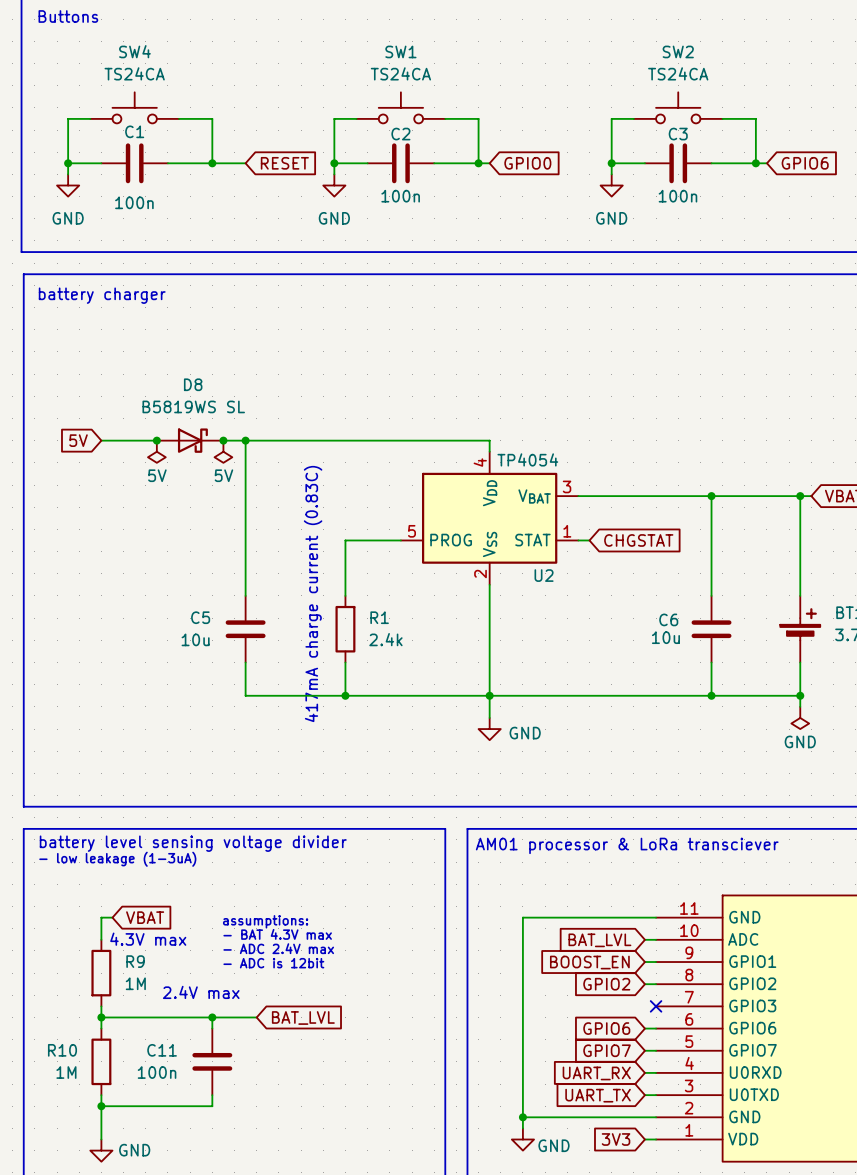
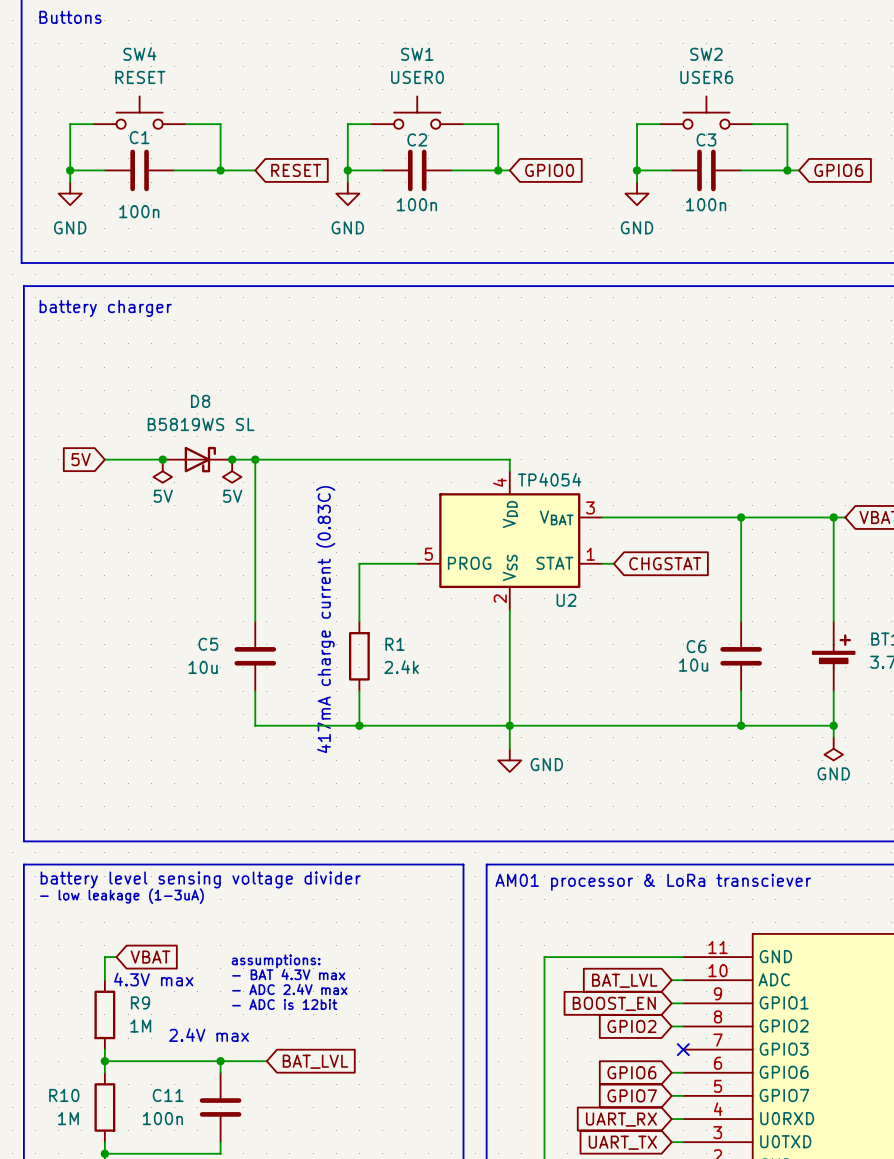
SW4 value: TS24CA (134, 73) -> RESET (140, 77)
SW1 value: TS24CA (400, 73) -> USER0 (417, 77)
SW2 value: TS24CA (678, 73) -> USER6 (706, 77)

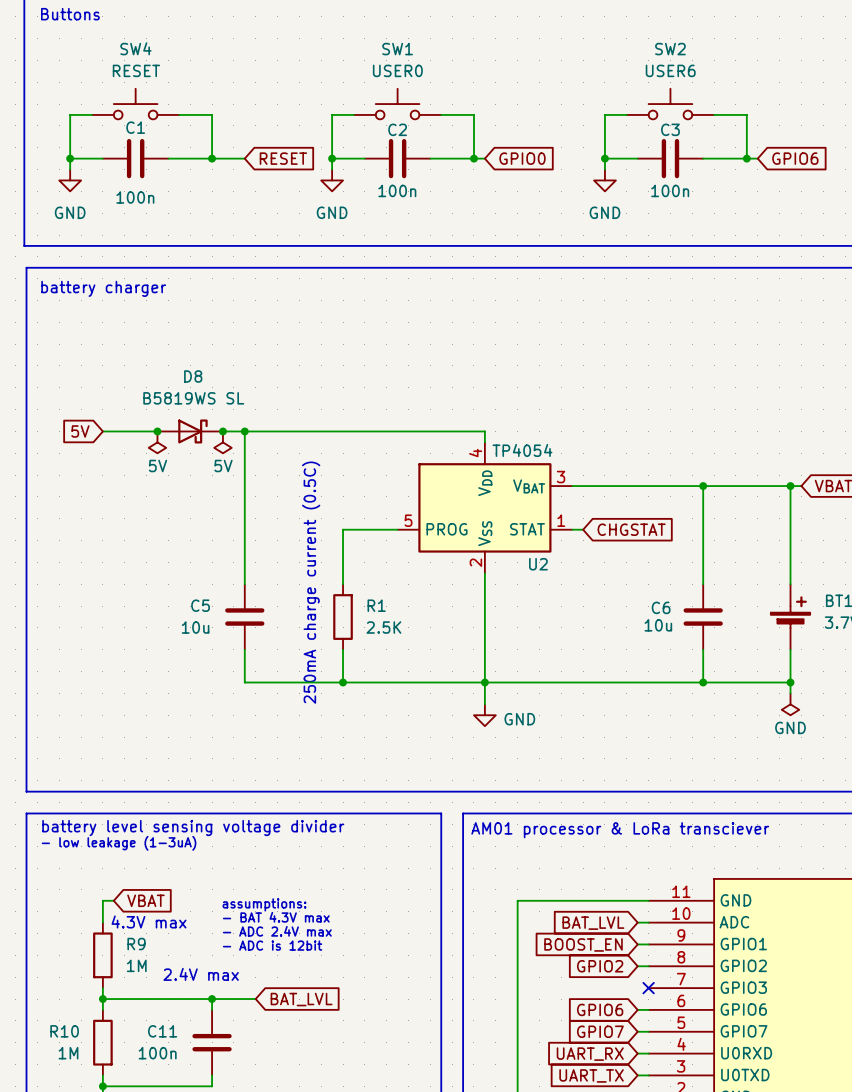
text: 417mA charge current (0.83C) (325, 619) -> 250mA charge current (0.5C) (311, 582)
R1 value: 2.4k (401, 667) -> 2.5K (383, 627)

